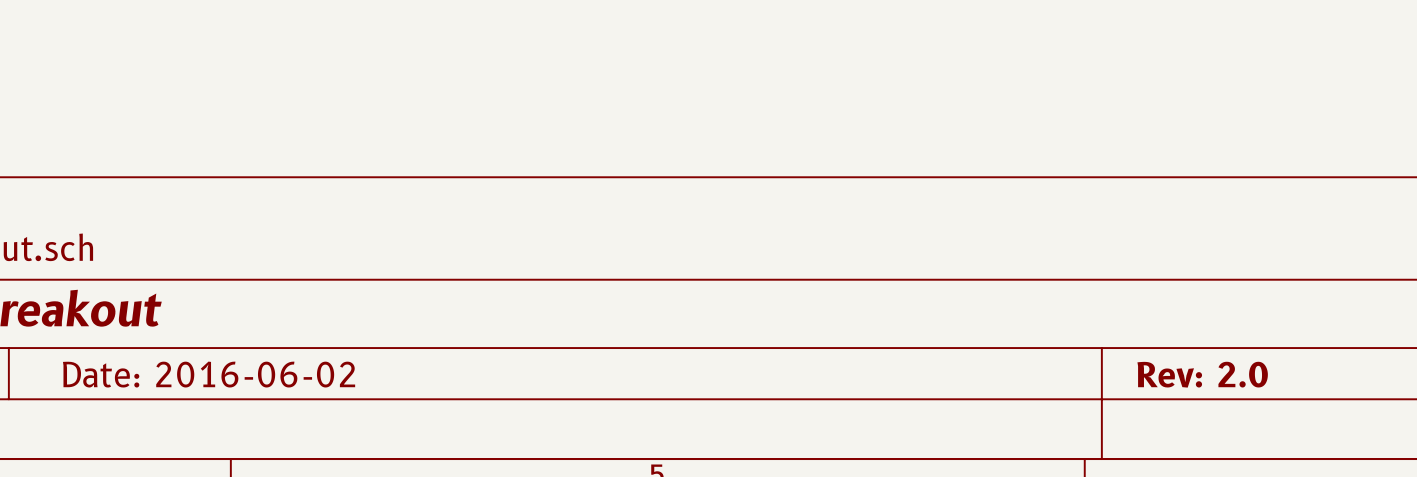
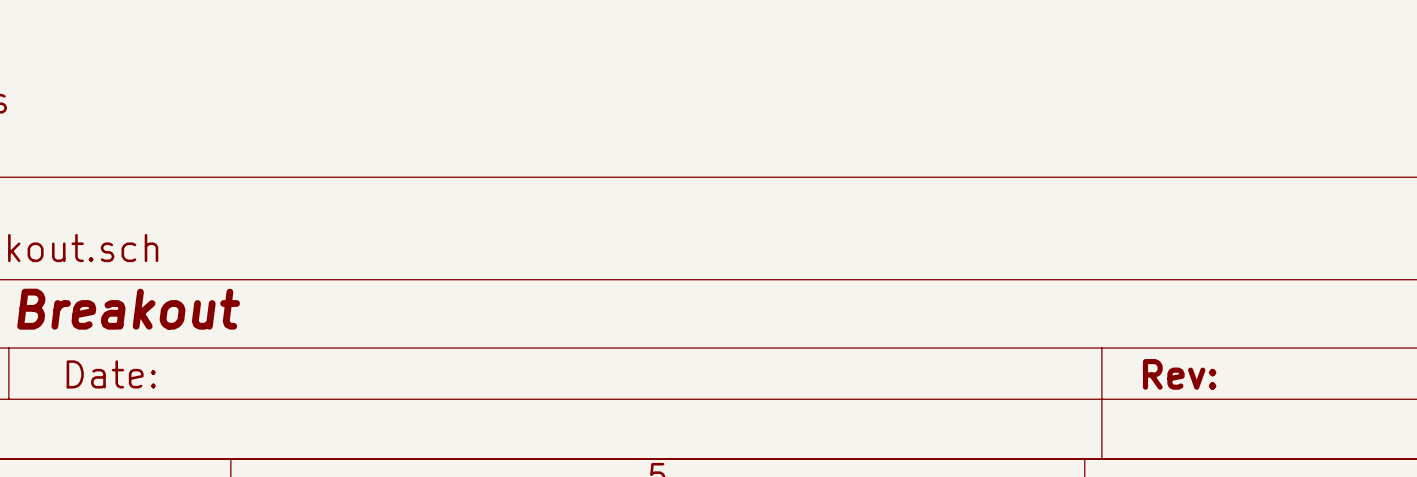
title block: Date: 2016-06-02 (209, 374) -> Date: (111, 374)
title block: Rev: 2.0 (1202, 374) -> Rev: (1179, 374)

